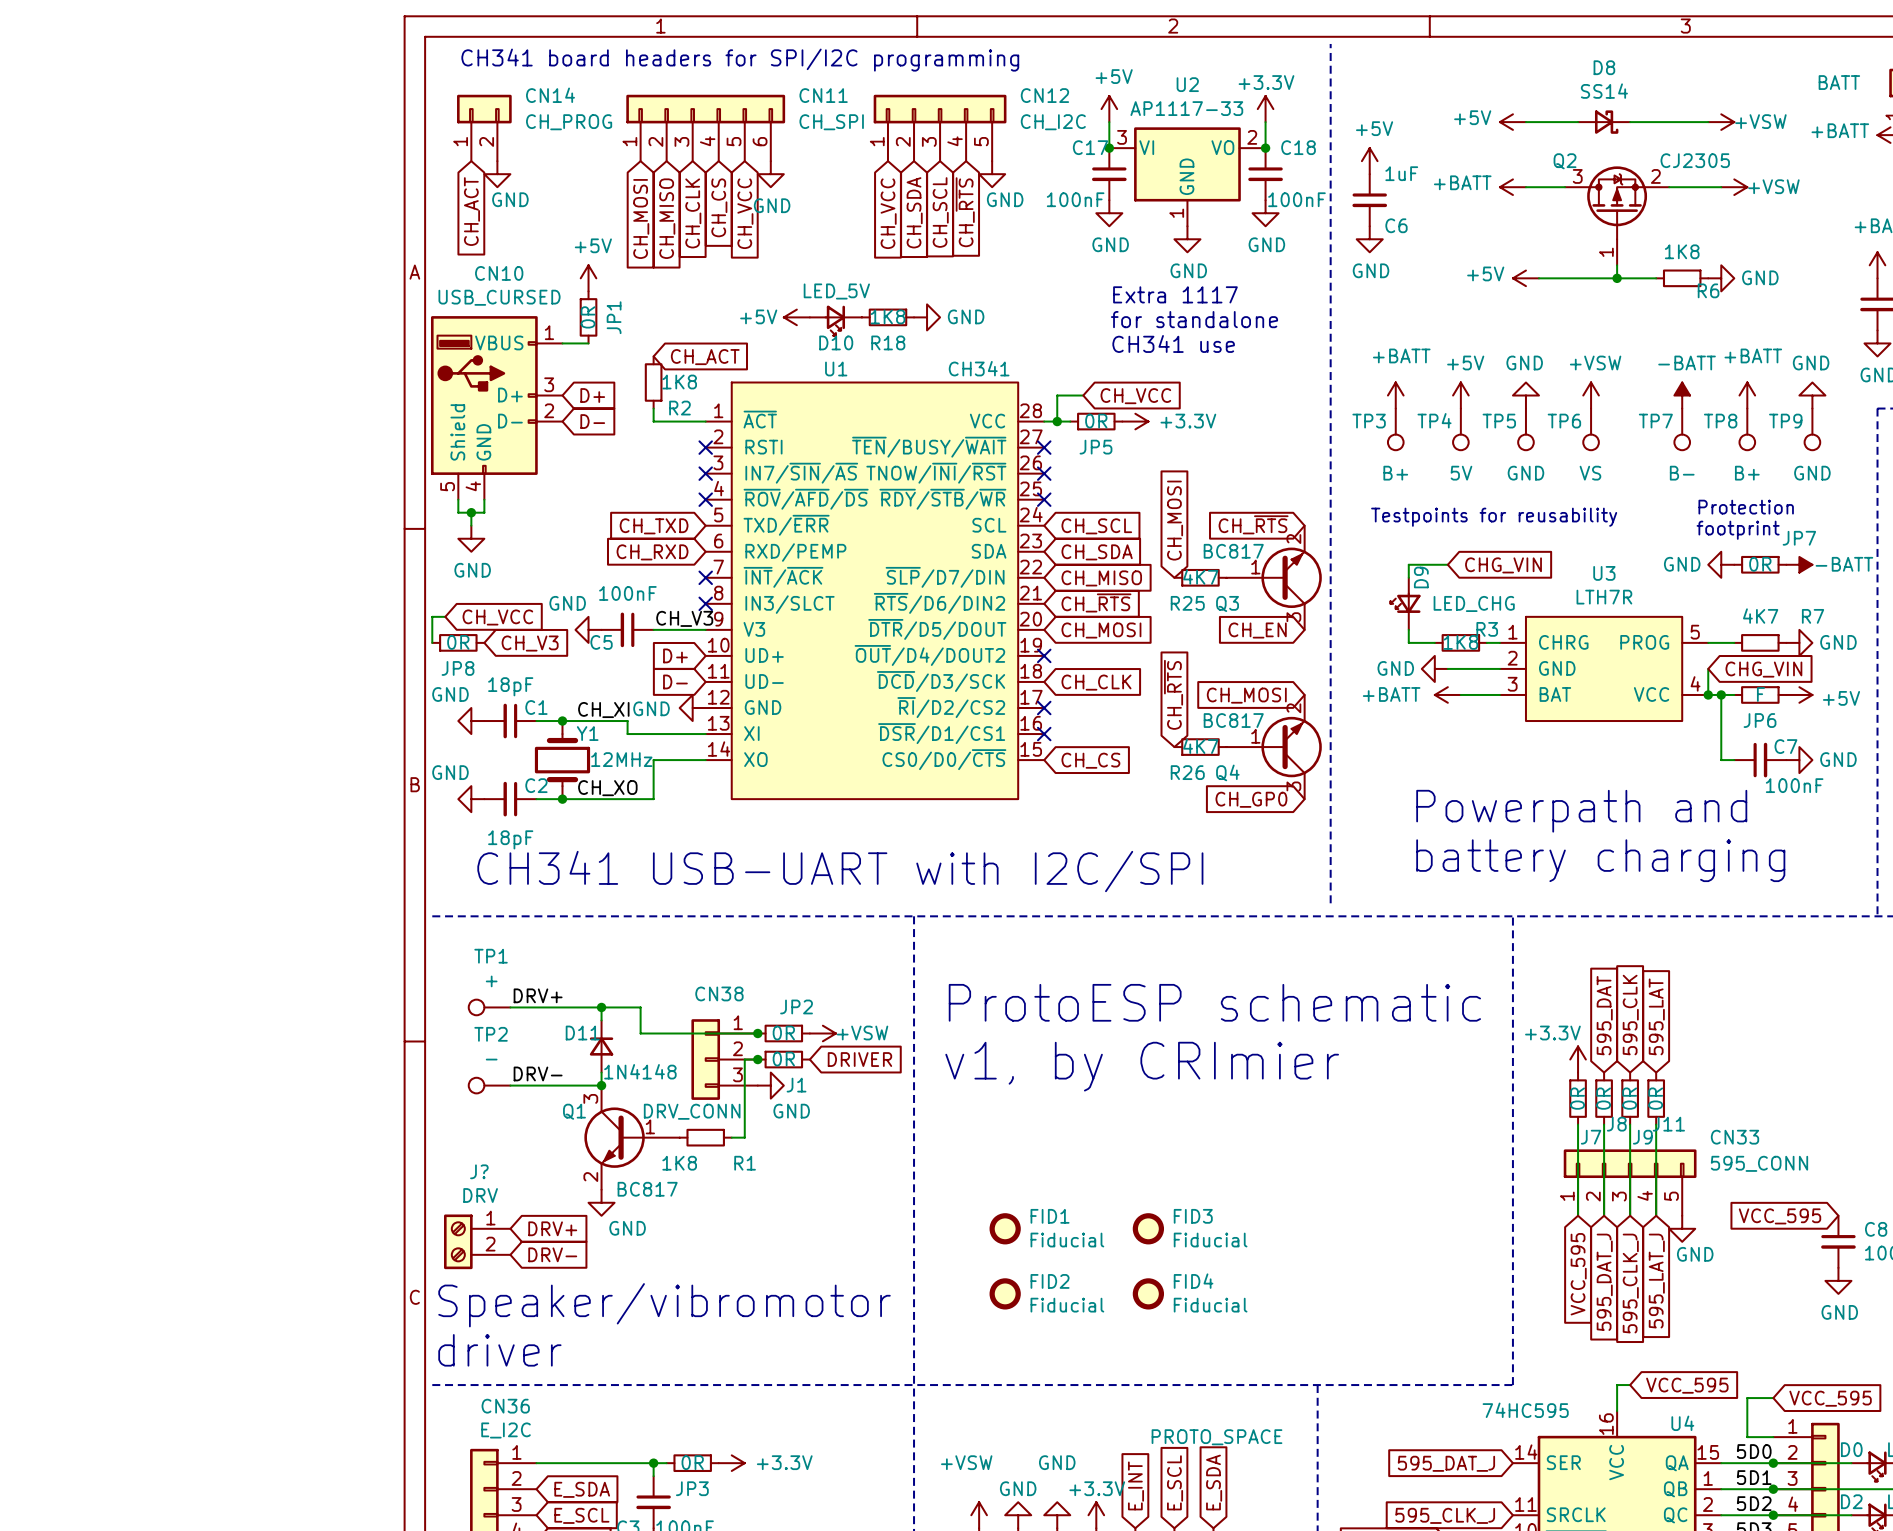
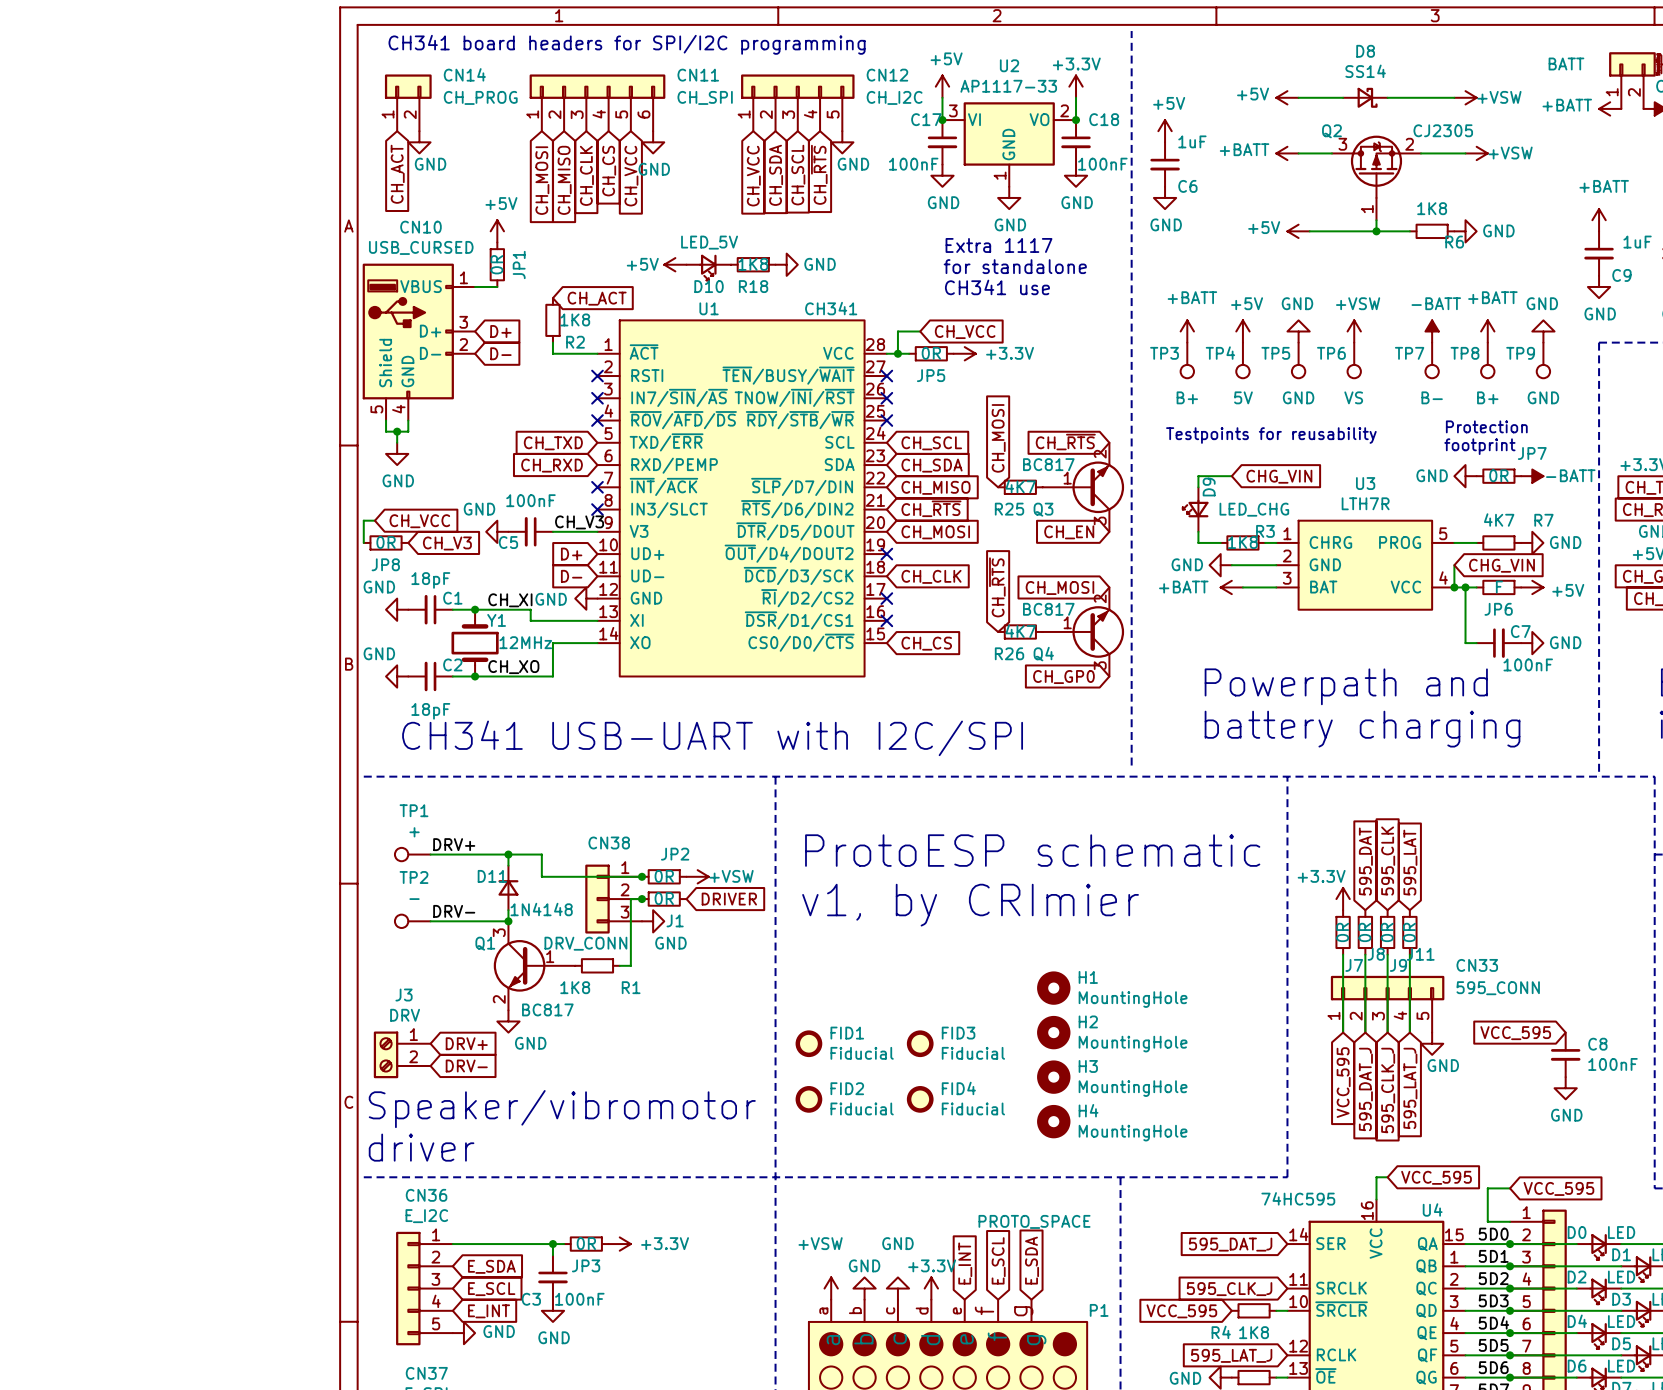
H1: none -> MountingHole (1053, 988)
J? name: J? (479, 1171) -> J3 (404, 995)
H2: none -> MountingHole (1053, 1032)
FID1 position: (1005, 1228) -> (808, 1043)
FID3 position: (1148, 1228) -> (920, 1043)
H3: none -> MountingHole (1053, 1077)
FID2 position: (1005, 1293) -> (808, 1099)
FID4 position: (1148, 1293) -> (920, 1099)
H4: none -> MountingHole (1053, 1121)

